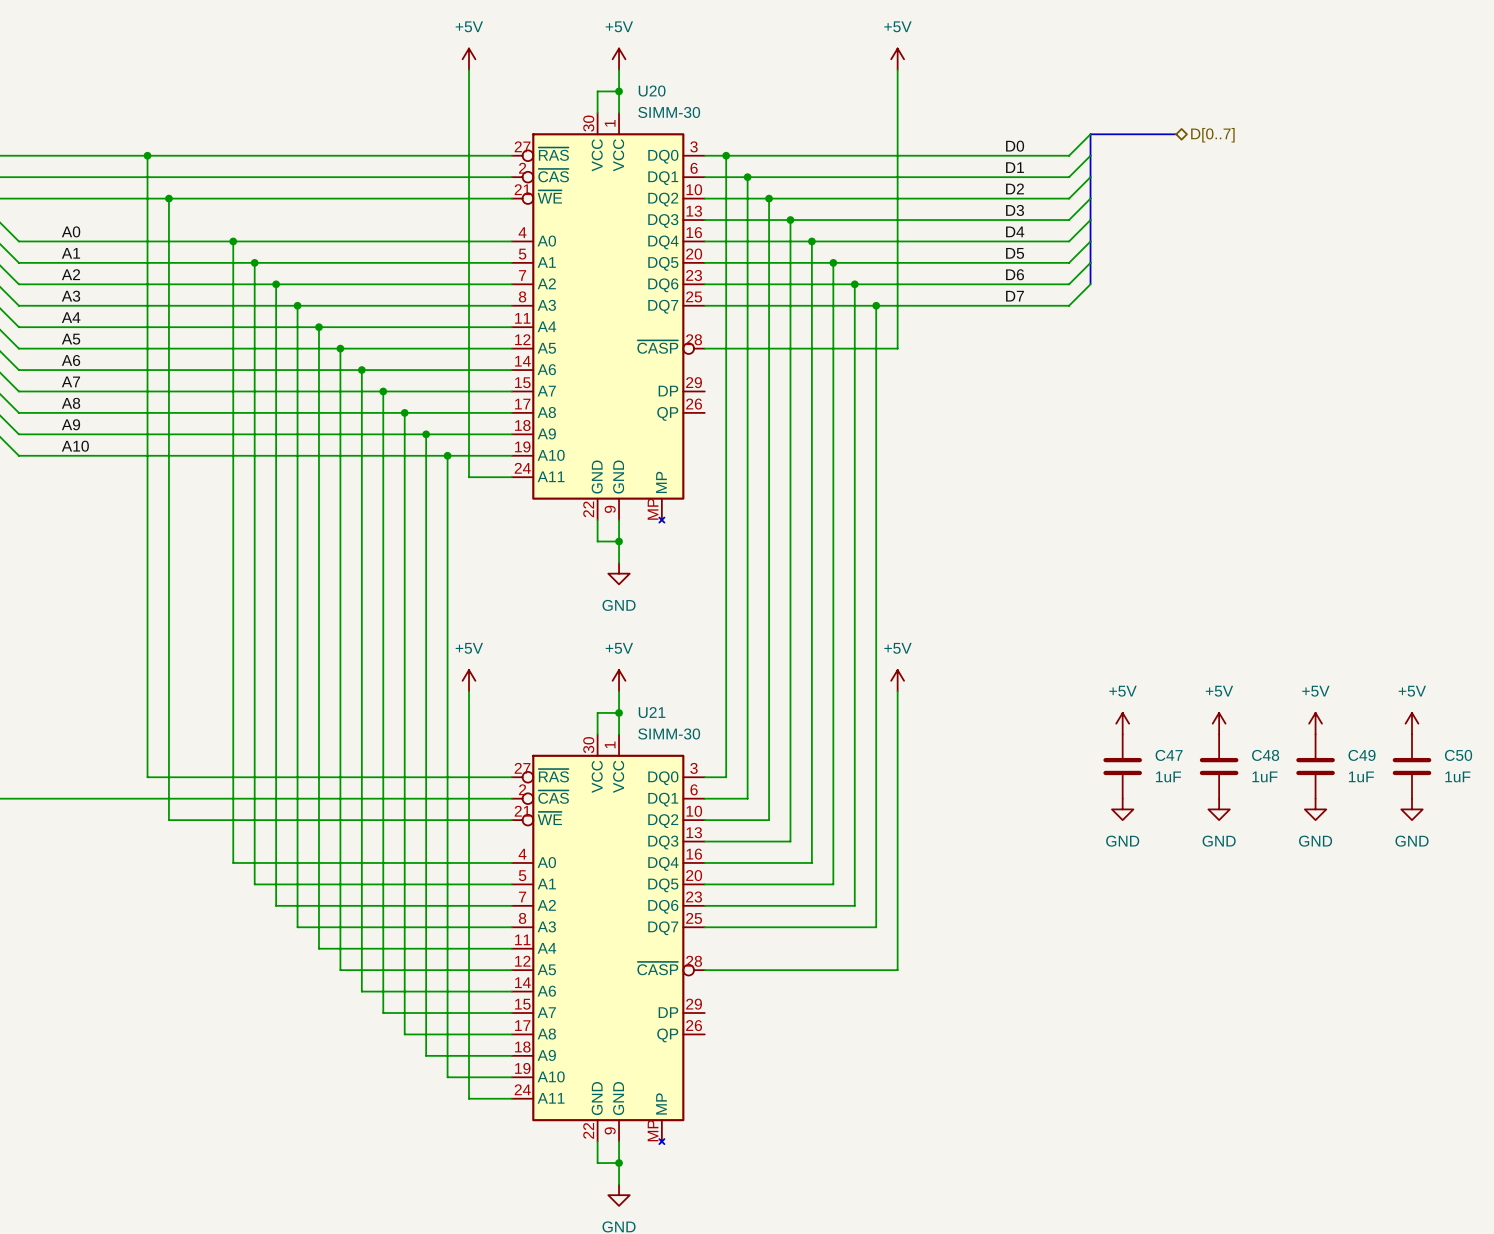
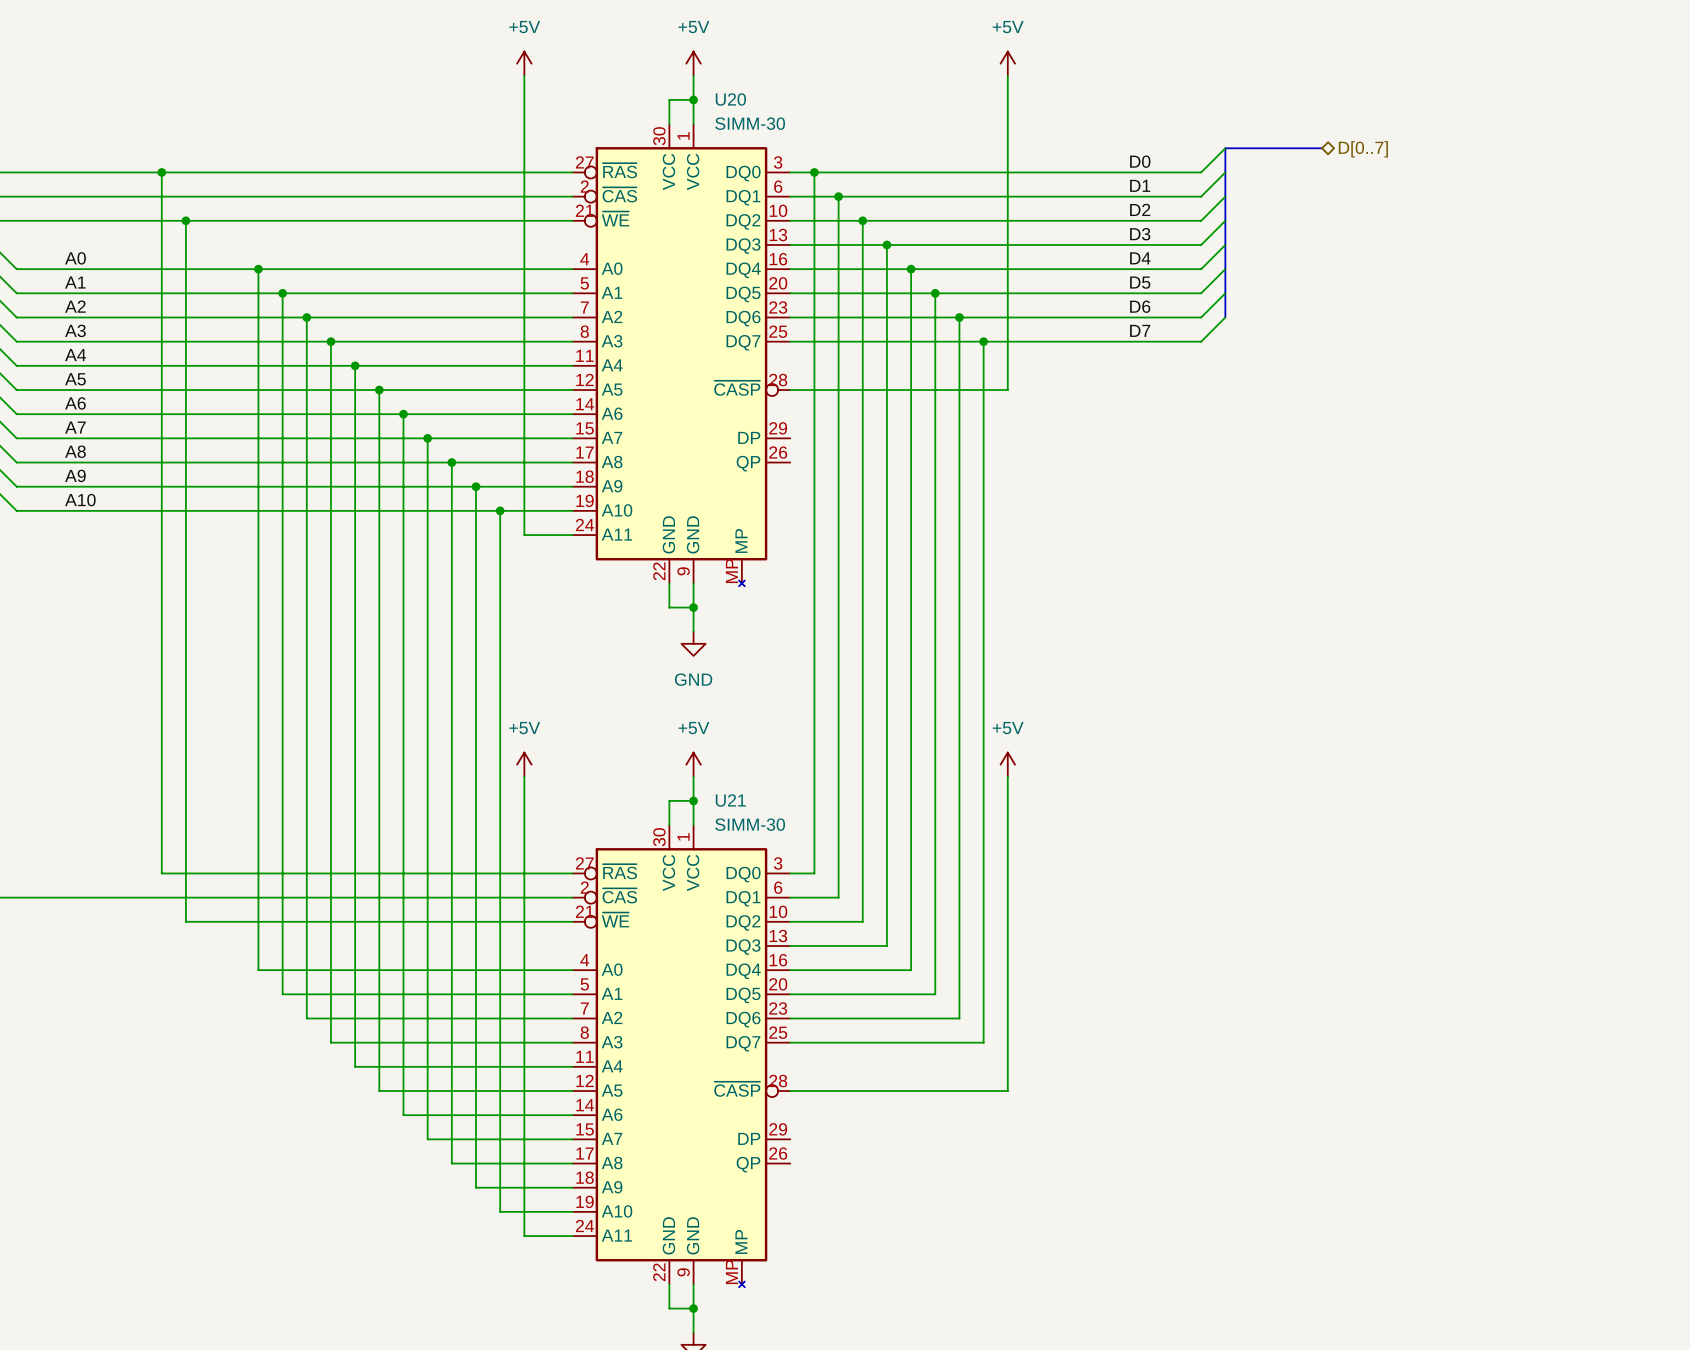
power symbol: +5V (1122, 723) -> none
power symbol: +5V (1219, 723) -> none
power symbol: +5V (1315, 723) -> none
power symbol: +5V (1412, 723) -> none
C47: 1uF (1122, 766) -> none
C48: 1uF (1219, 766) -> none
C49: 1uF (1315, 766) -> none
C50: 1uF (1412, 766) -> none
power symbol: GND (1122, 809) -> none
power symbol: GND (1219, 809) -> none
power symbol: GND (1315, 809) -> none
power symbol: GND (1412, 809) -> none

